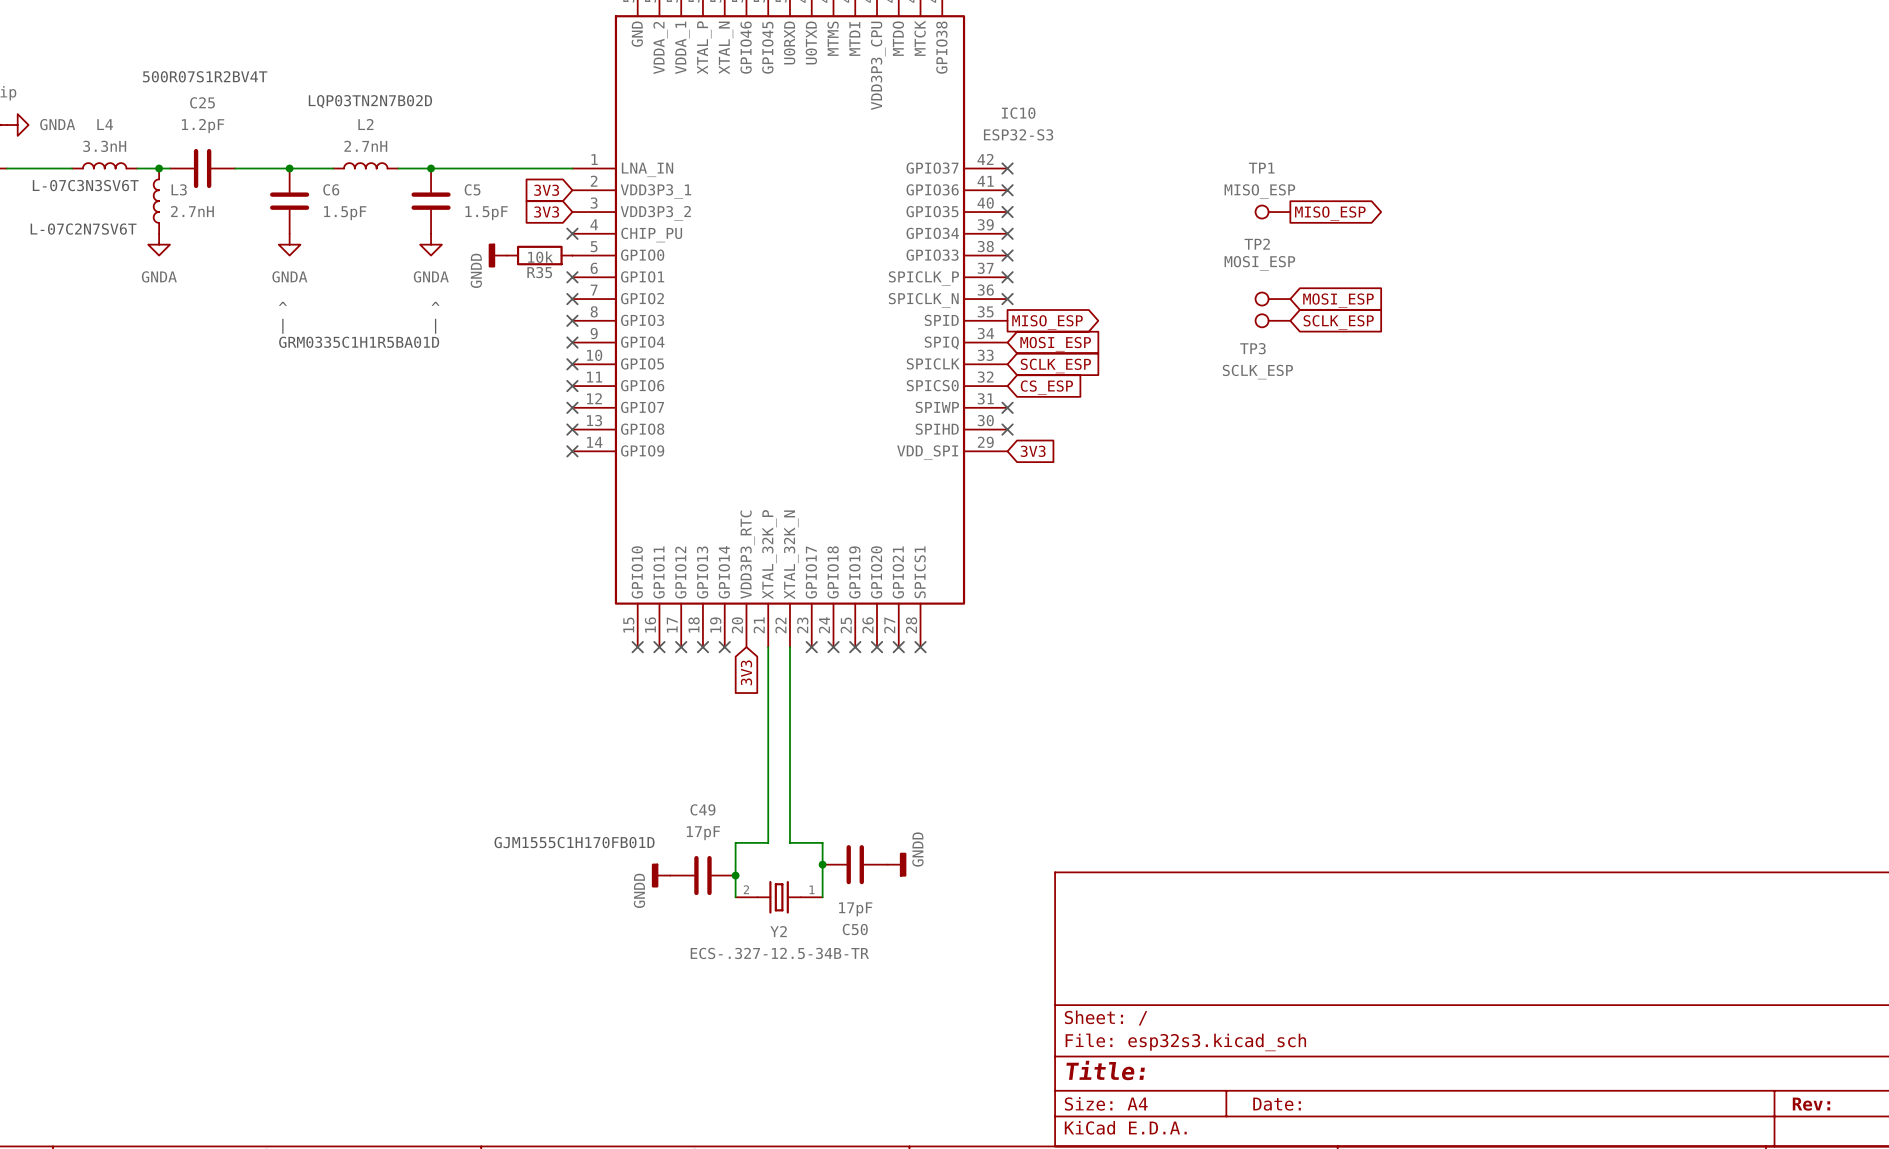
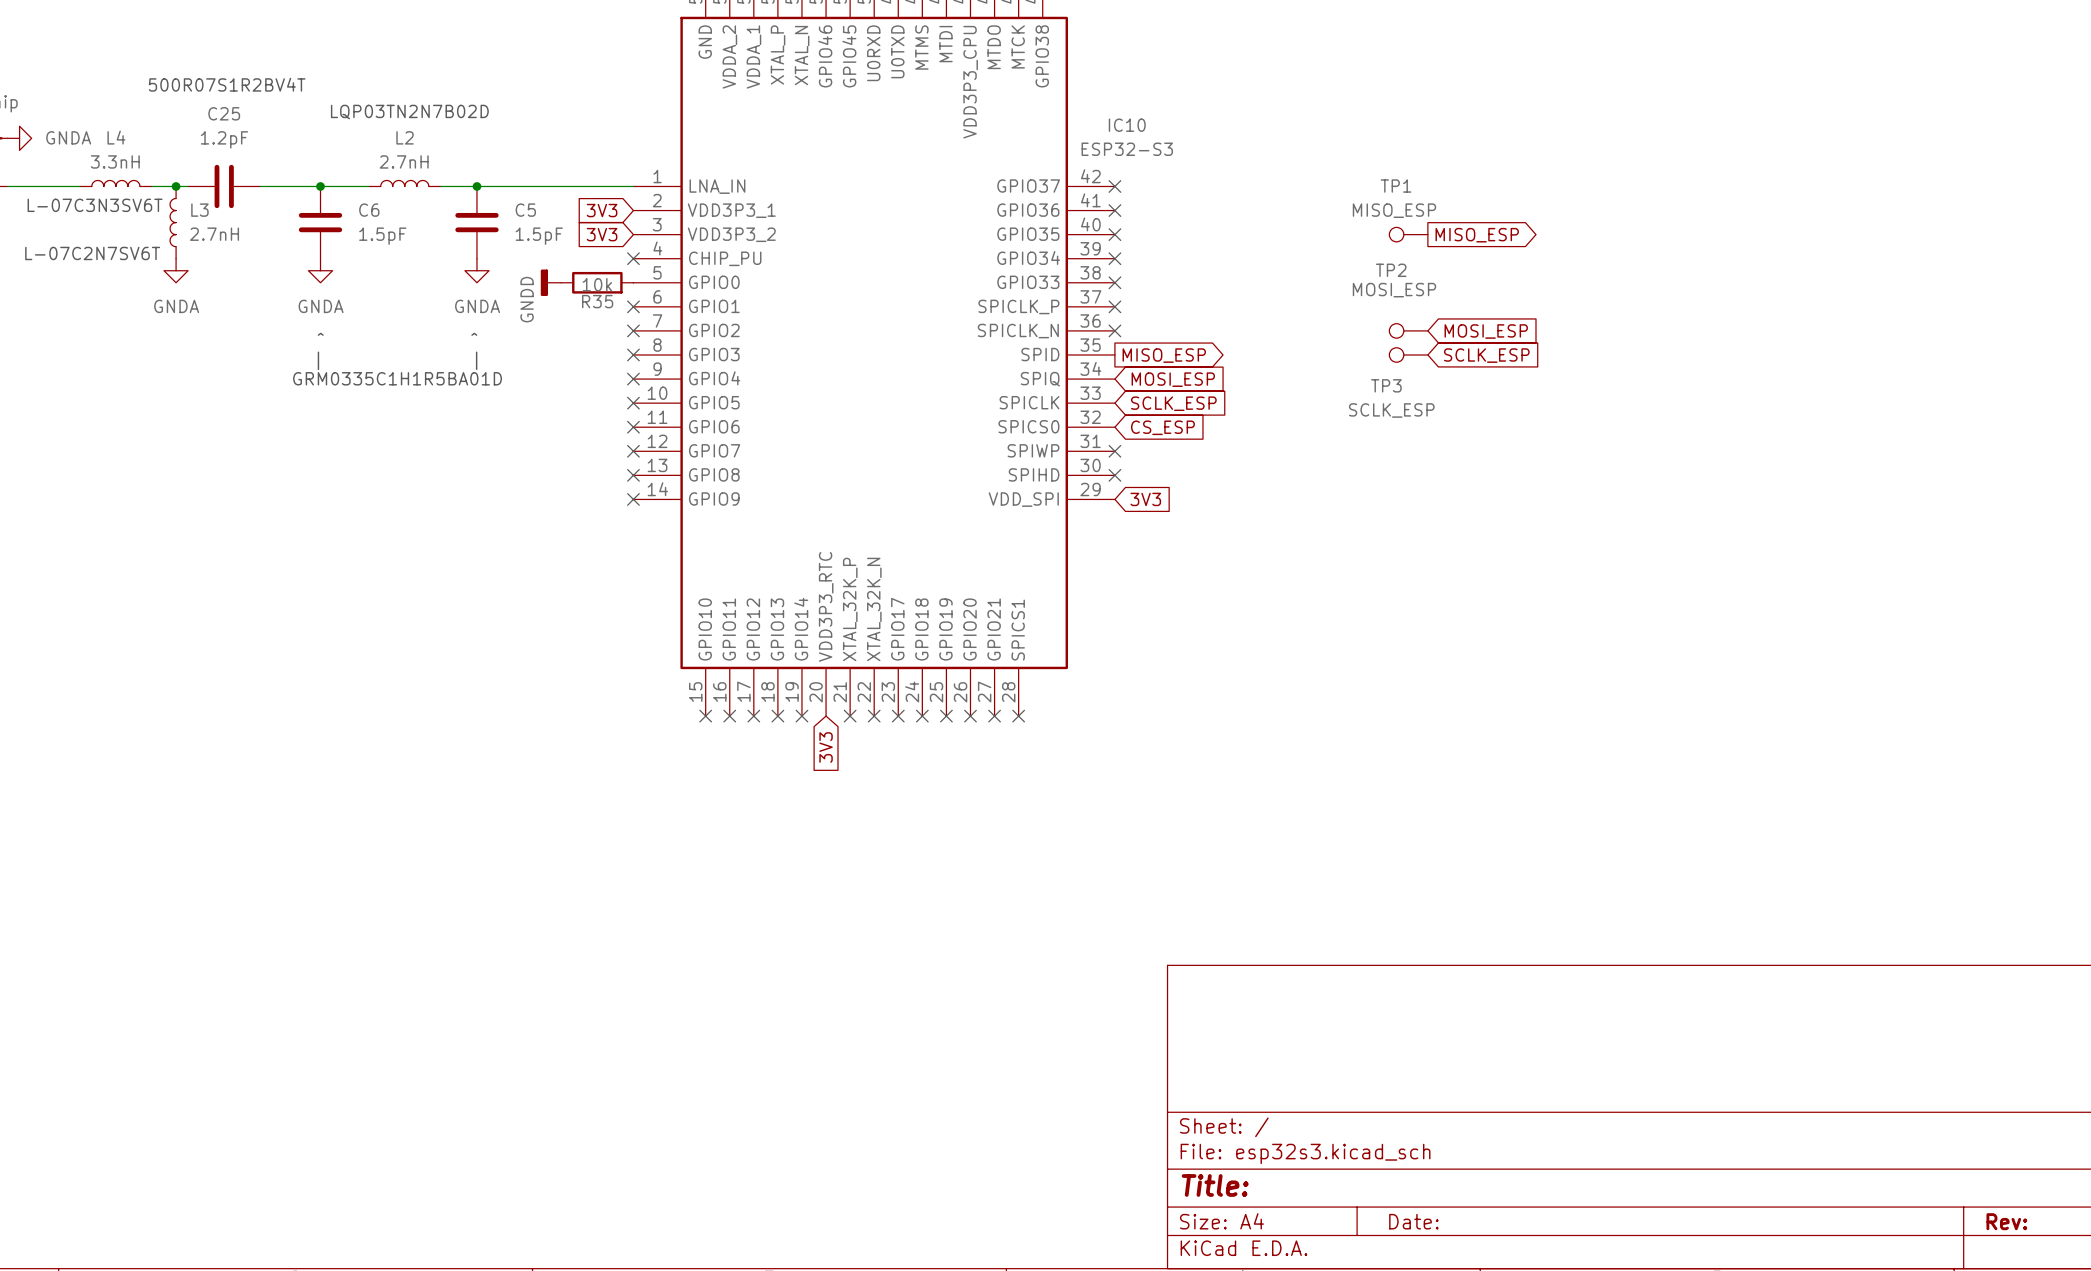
wire: (768, 647) (768, 842) (735, 842) (735, 897) -> none
no-connect mark: none -> (850, 716)
wire: (789, 647) (789, 842) (822, 842) (822, 897) -> none
no-connect mark: none -> (874, 716)
text: GJM1555C1H170FB01D (574, 842) -> none
junction: (822, 864) -> none
C50: 17pF (855, 864) -> none
power symbol: GNDD (897, 864) -> none
power symbol: GNDD (661, 875) -> none
C49: 17pF (702, 875) -> none
junction: (735, 875) -> none
Y2: ECS-.327-12.5-34B-TR (779, 897) -> none

